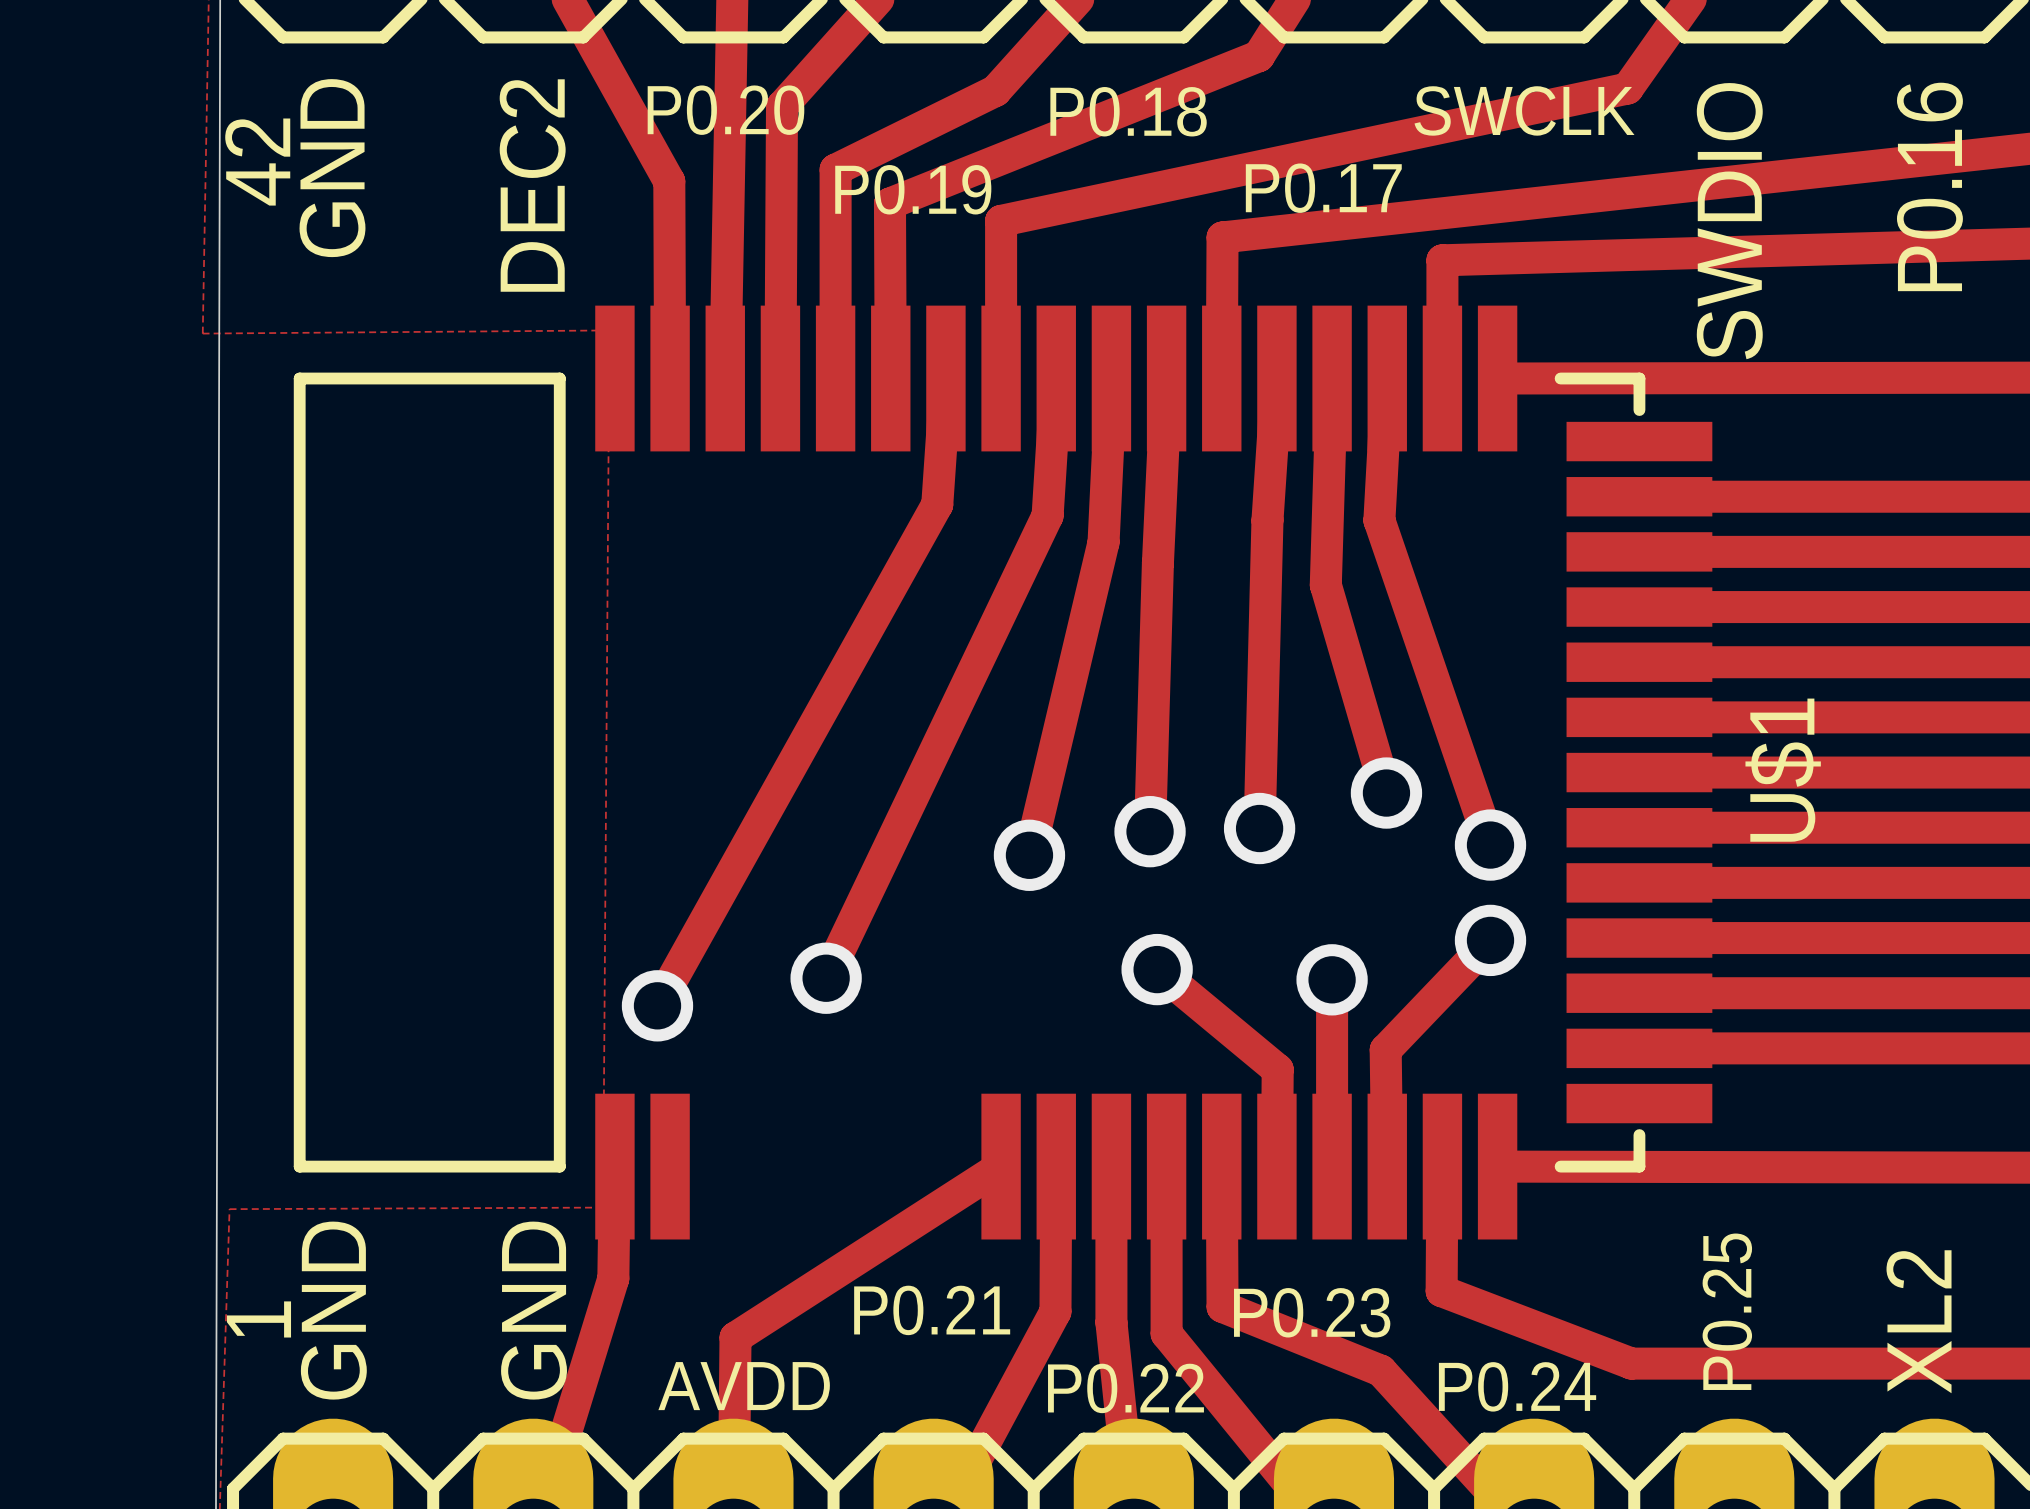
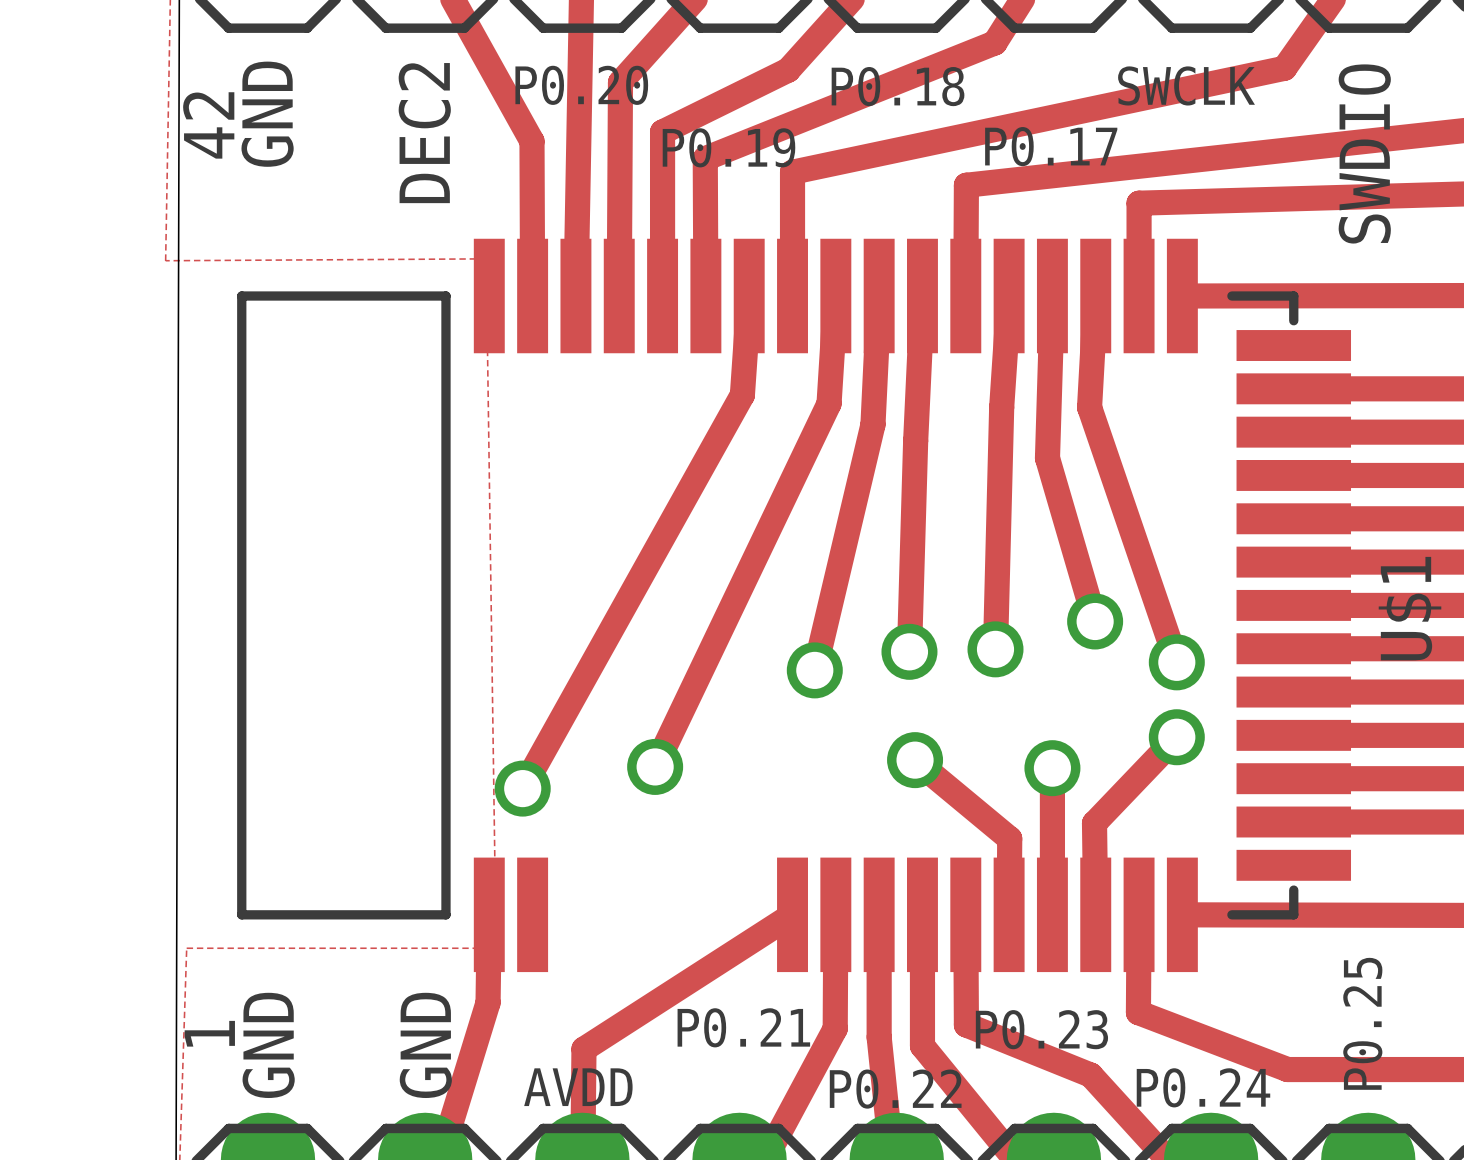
zone outline: (202, 333) (609, 330) (603, 1207) (229, 1209) -> (165, 260) (486, 258) (496, 948) (186, 948)

